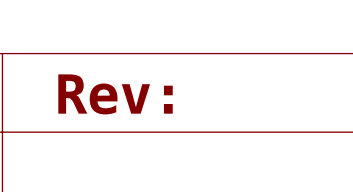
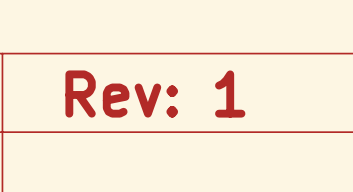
title block: Rev: (115, 94) -> Rev: 1 (155, 94)

